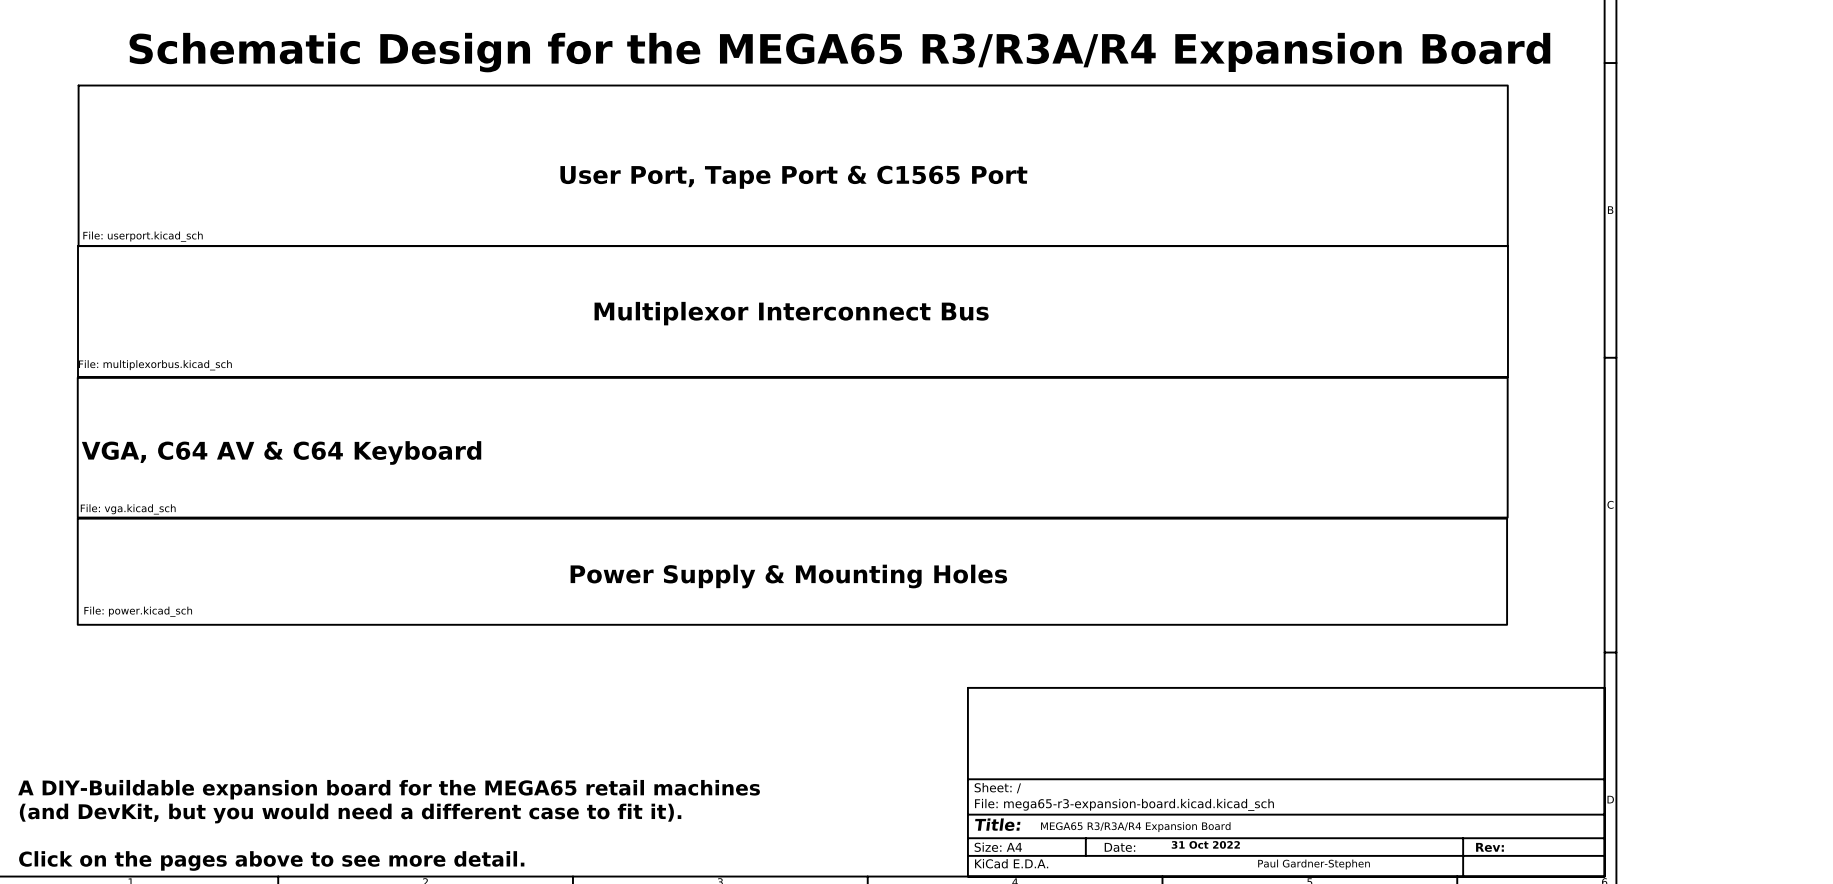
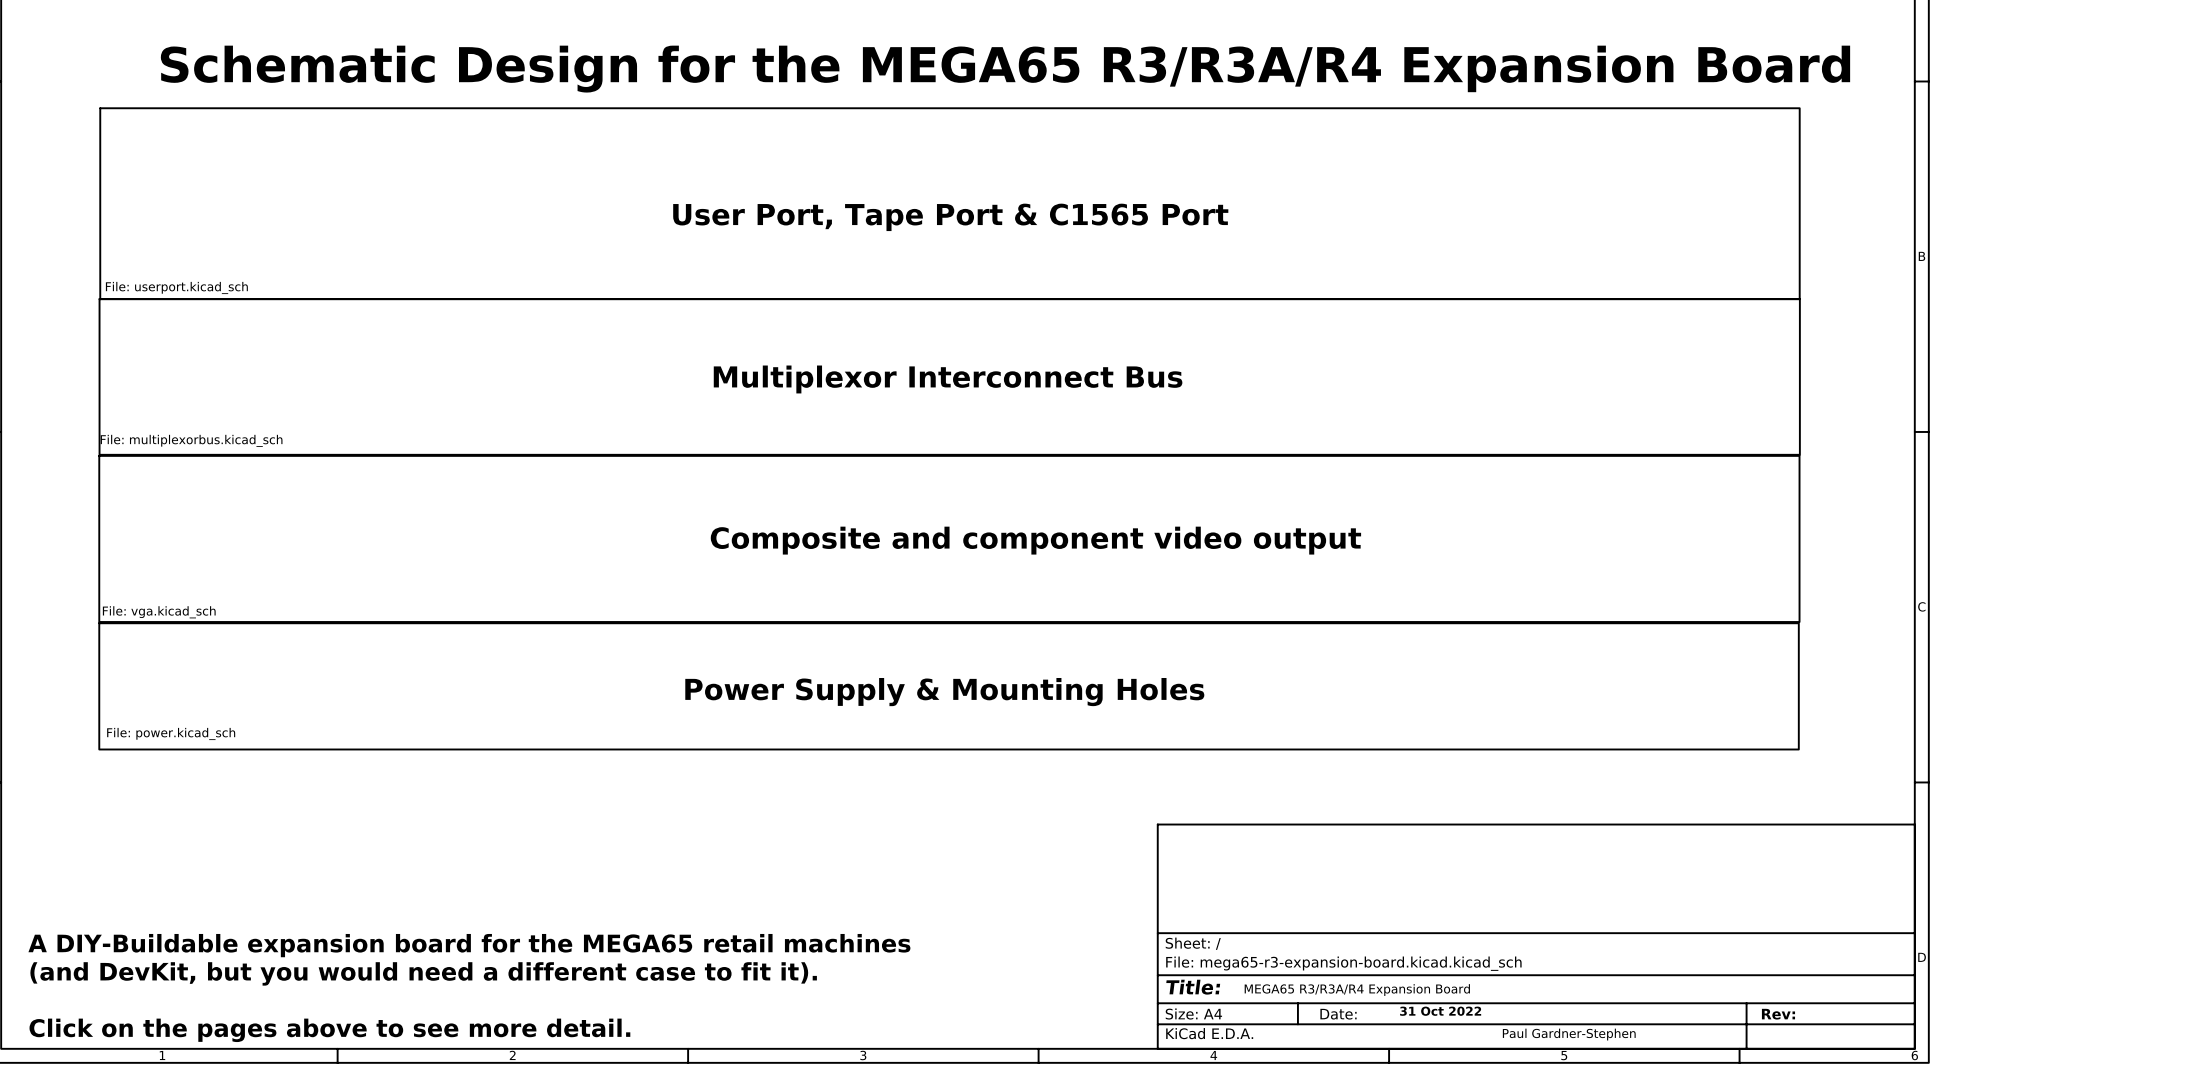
sheet VGA, C64 AV & C64 Keyboard name: VGA, C64 AV & C64 Keyboard (281, 452) -> Composite and component video output (1035, 540)

